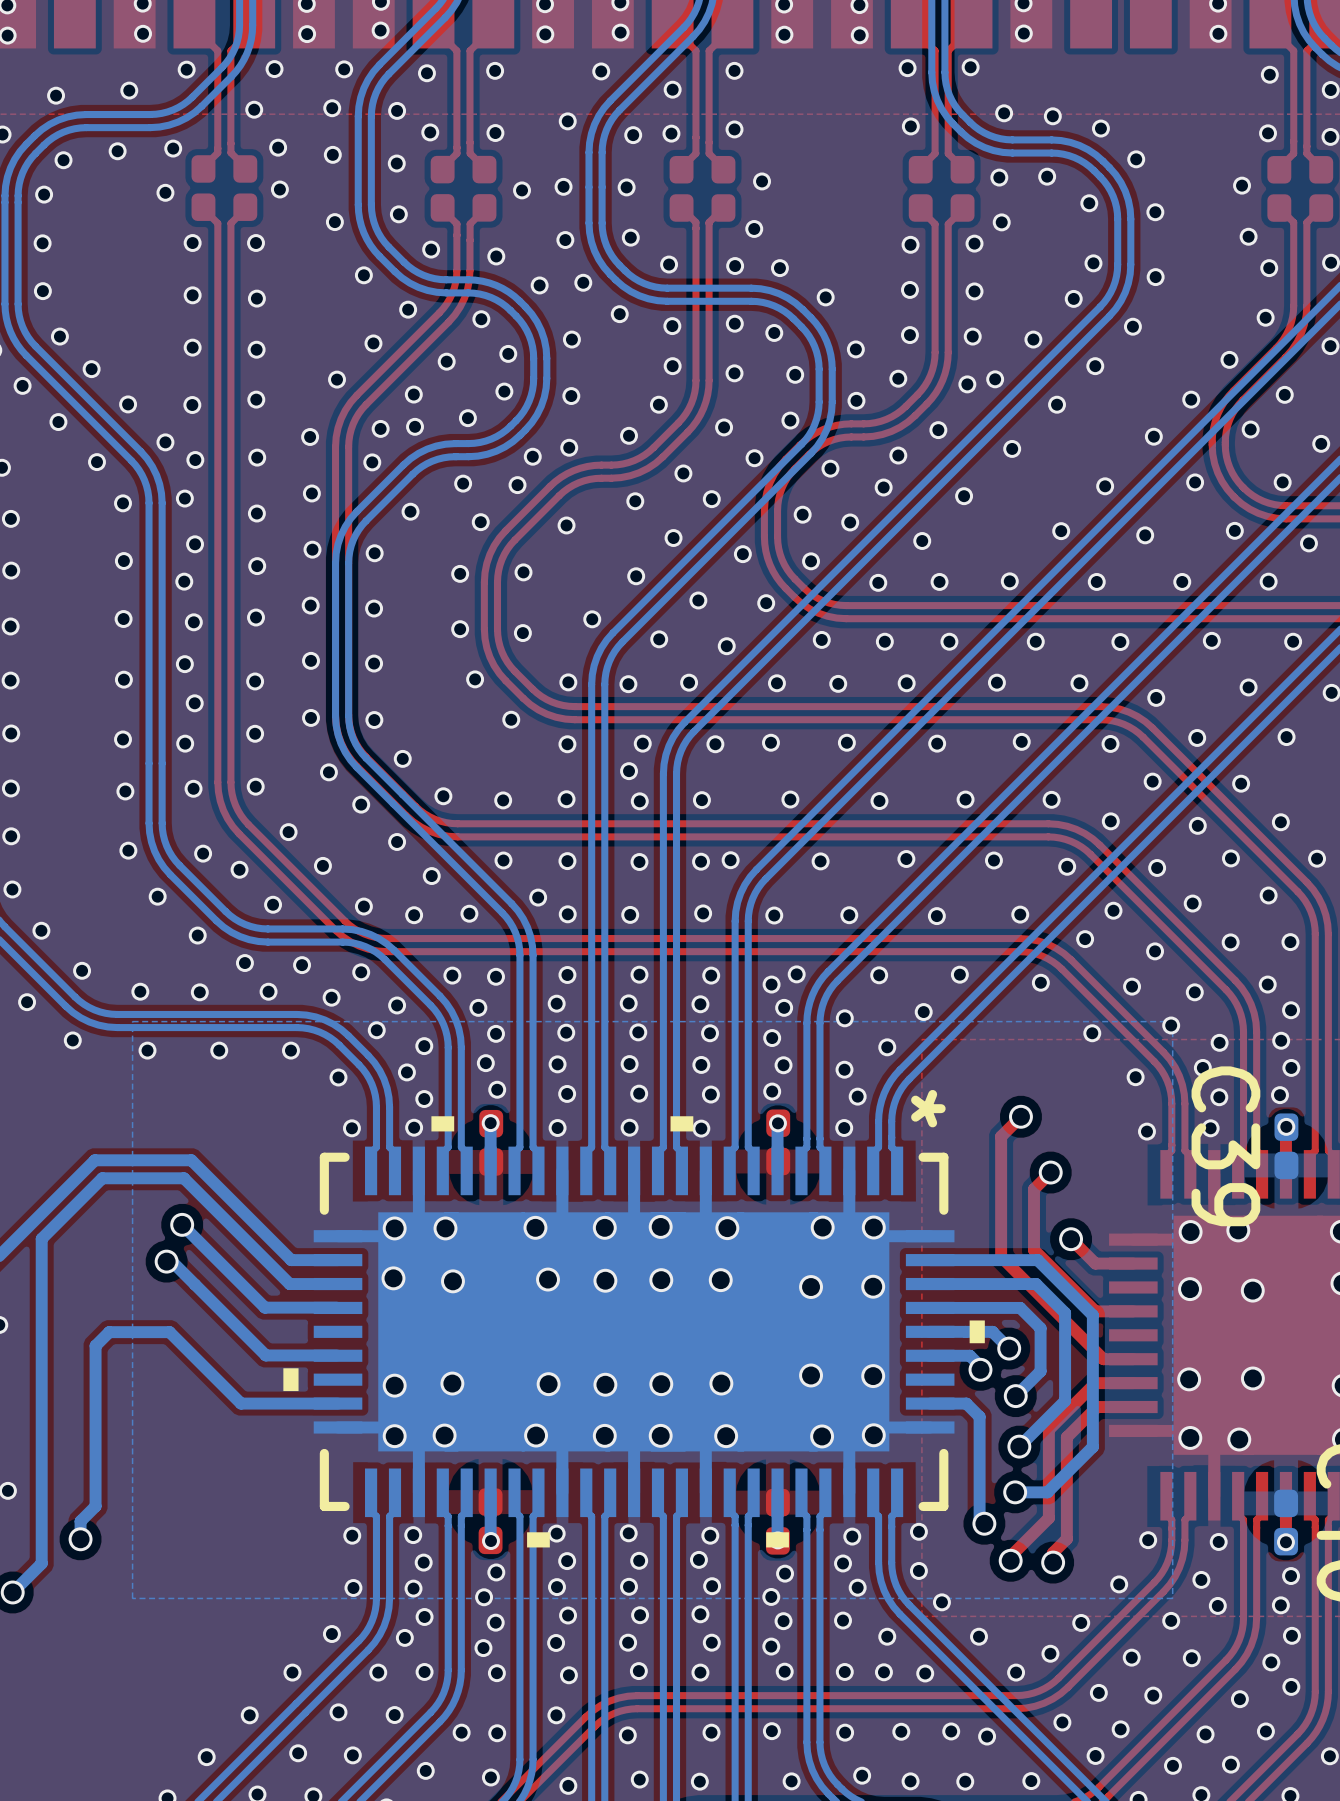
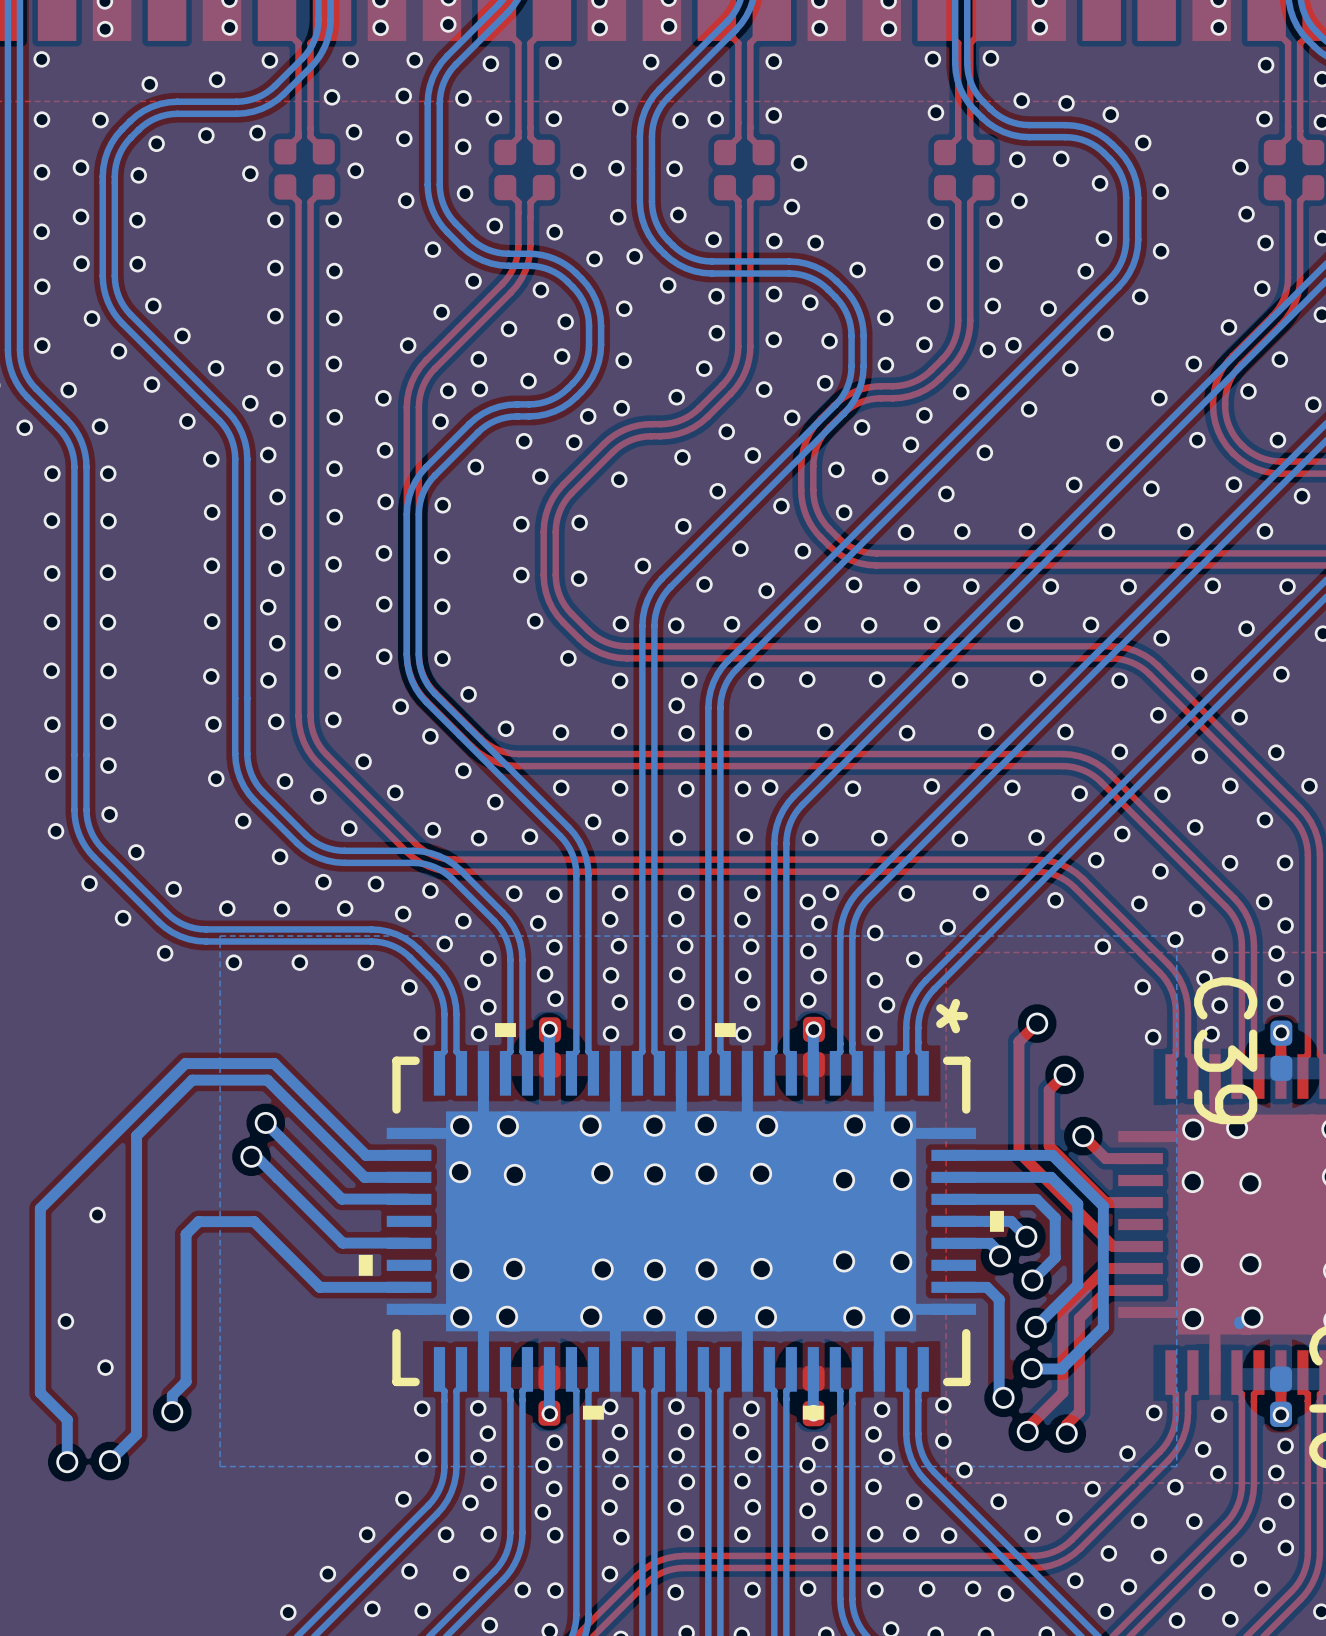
via position: (1239, 1439) -> (1252, 1317)

